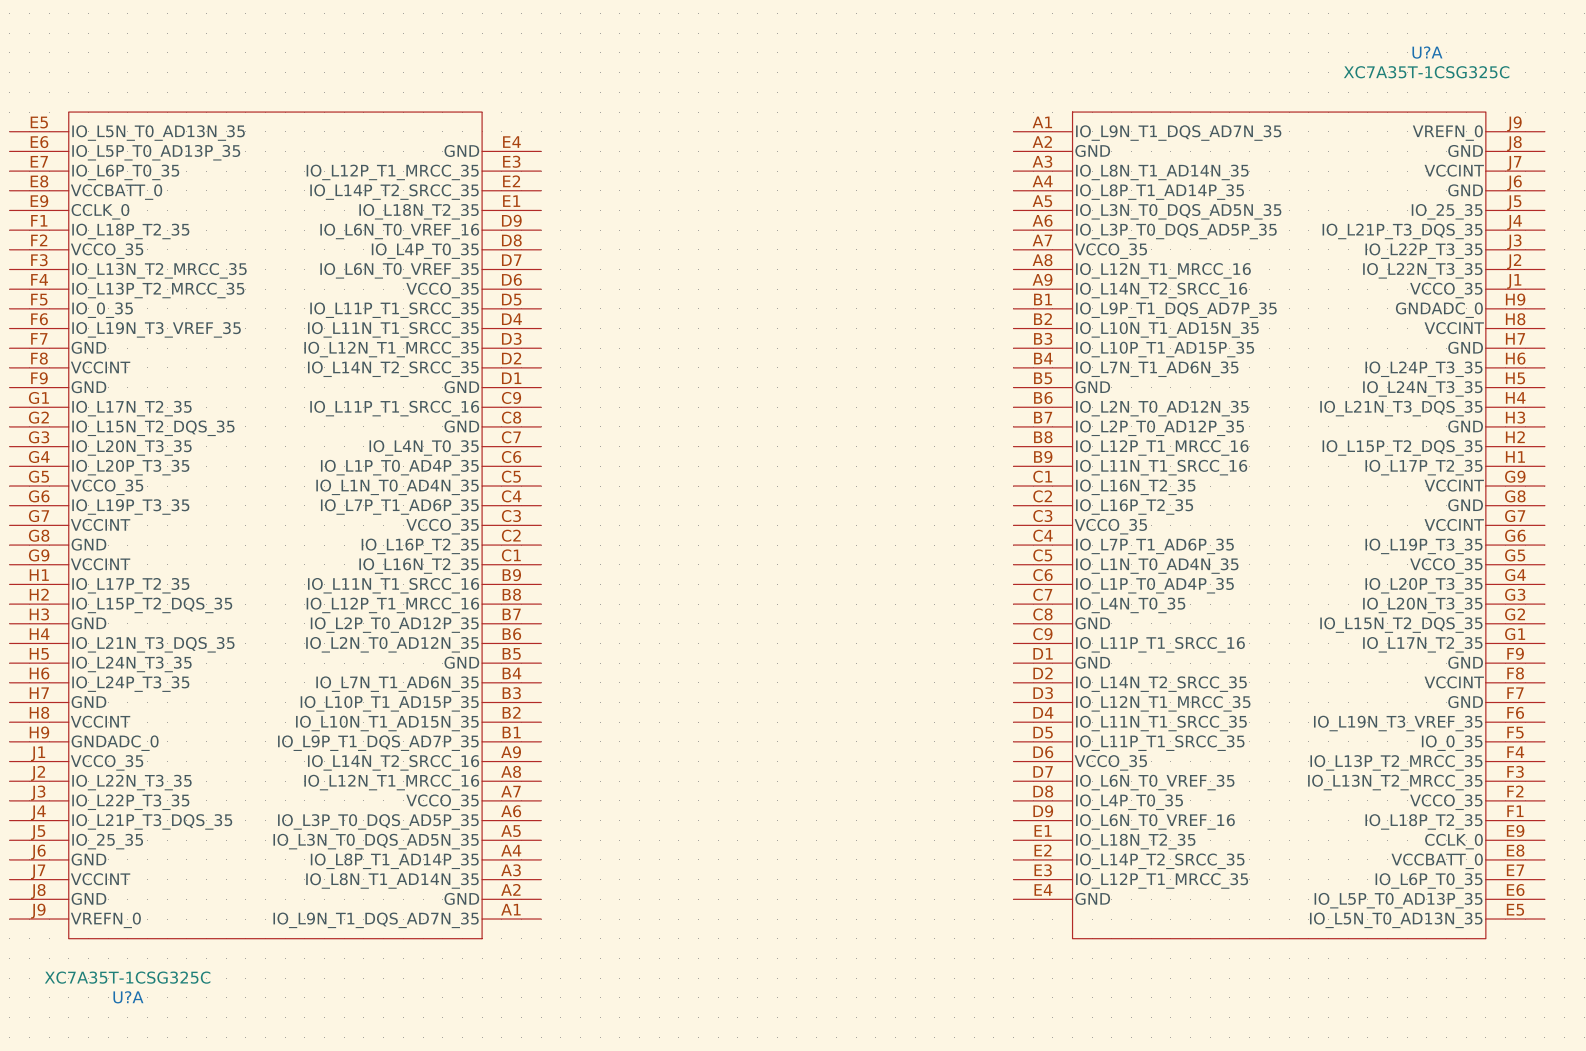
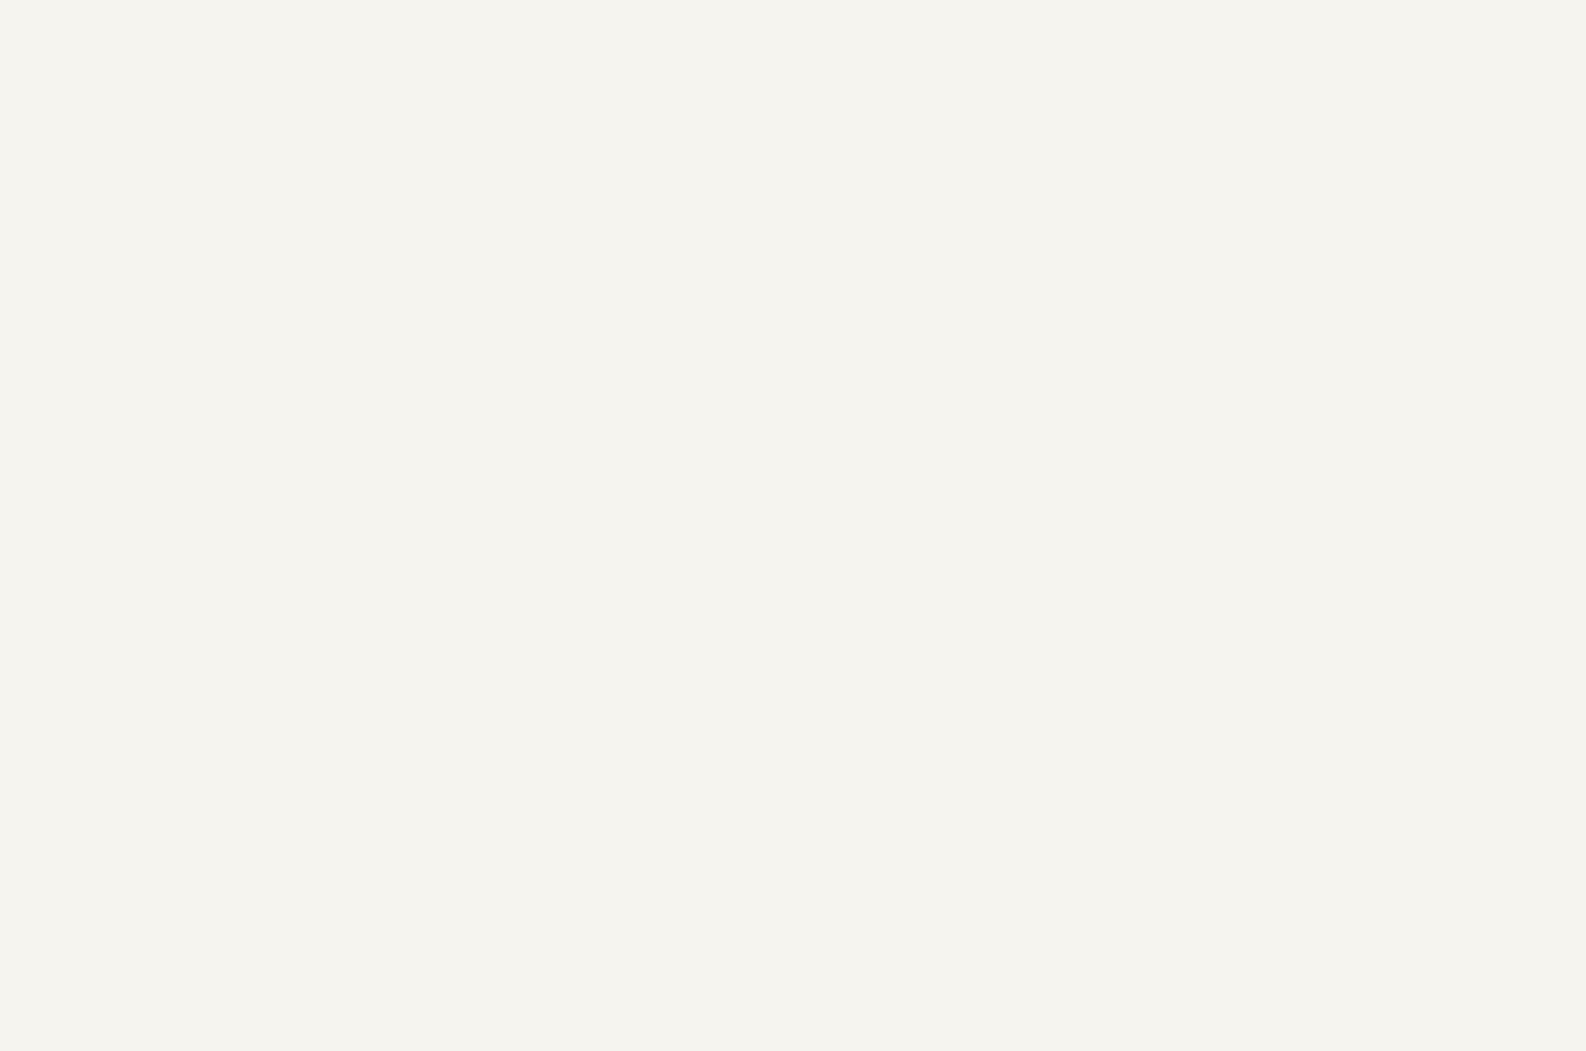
U?A: XC7A35T-1CSG325C (275, 525) -> none
U?A: XC7A35T-1CSG325C (1279, 525) -> none

